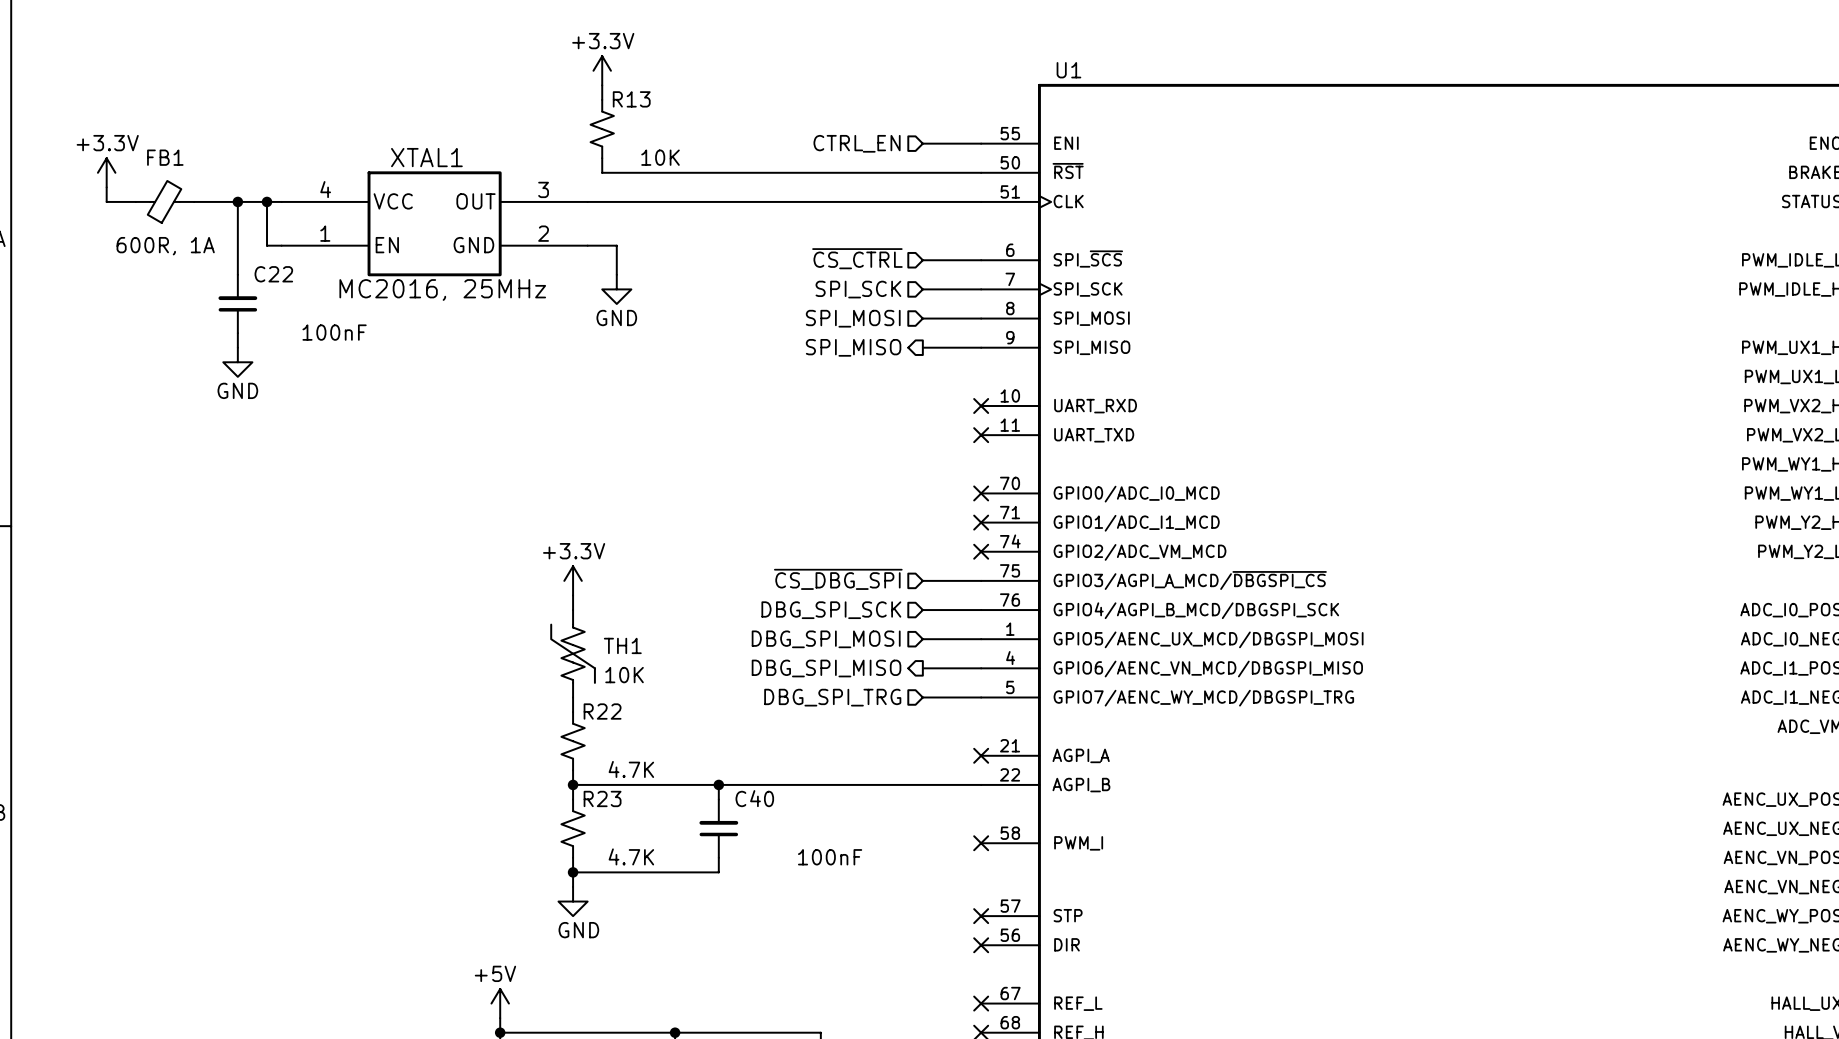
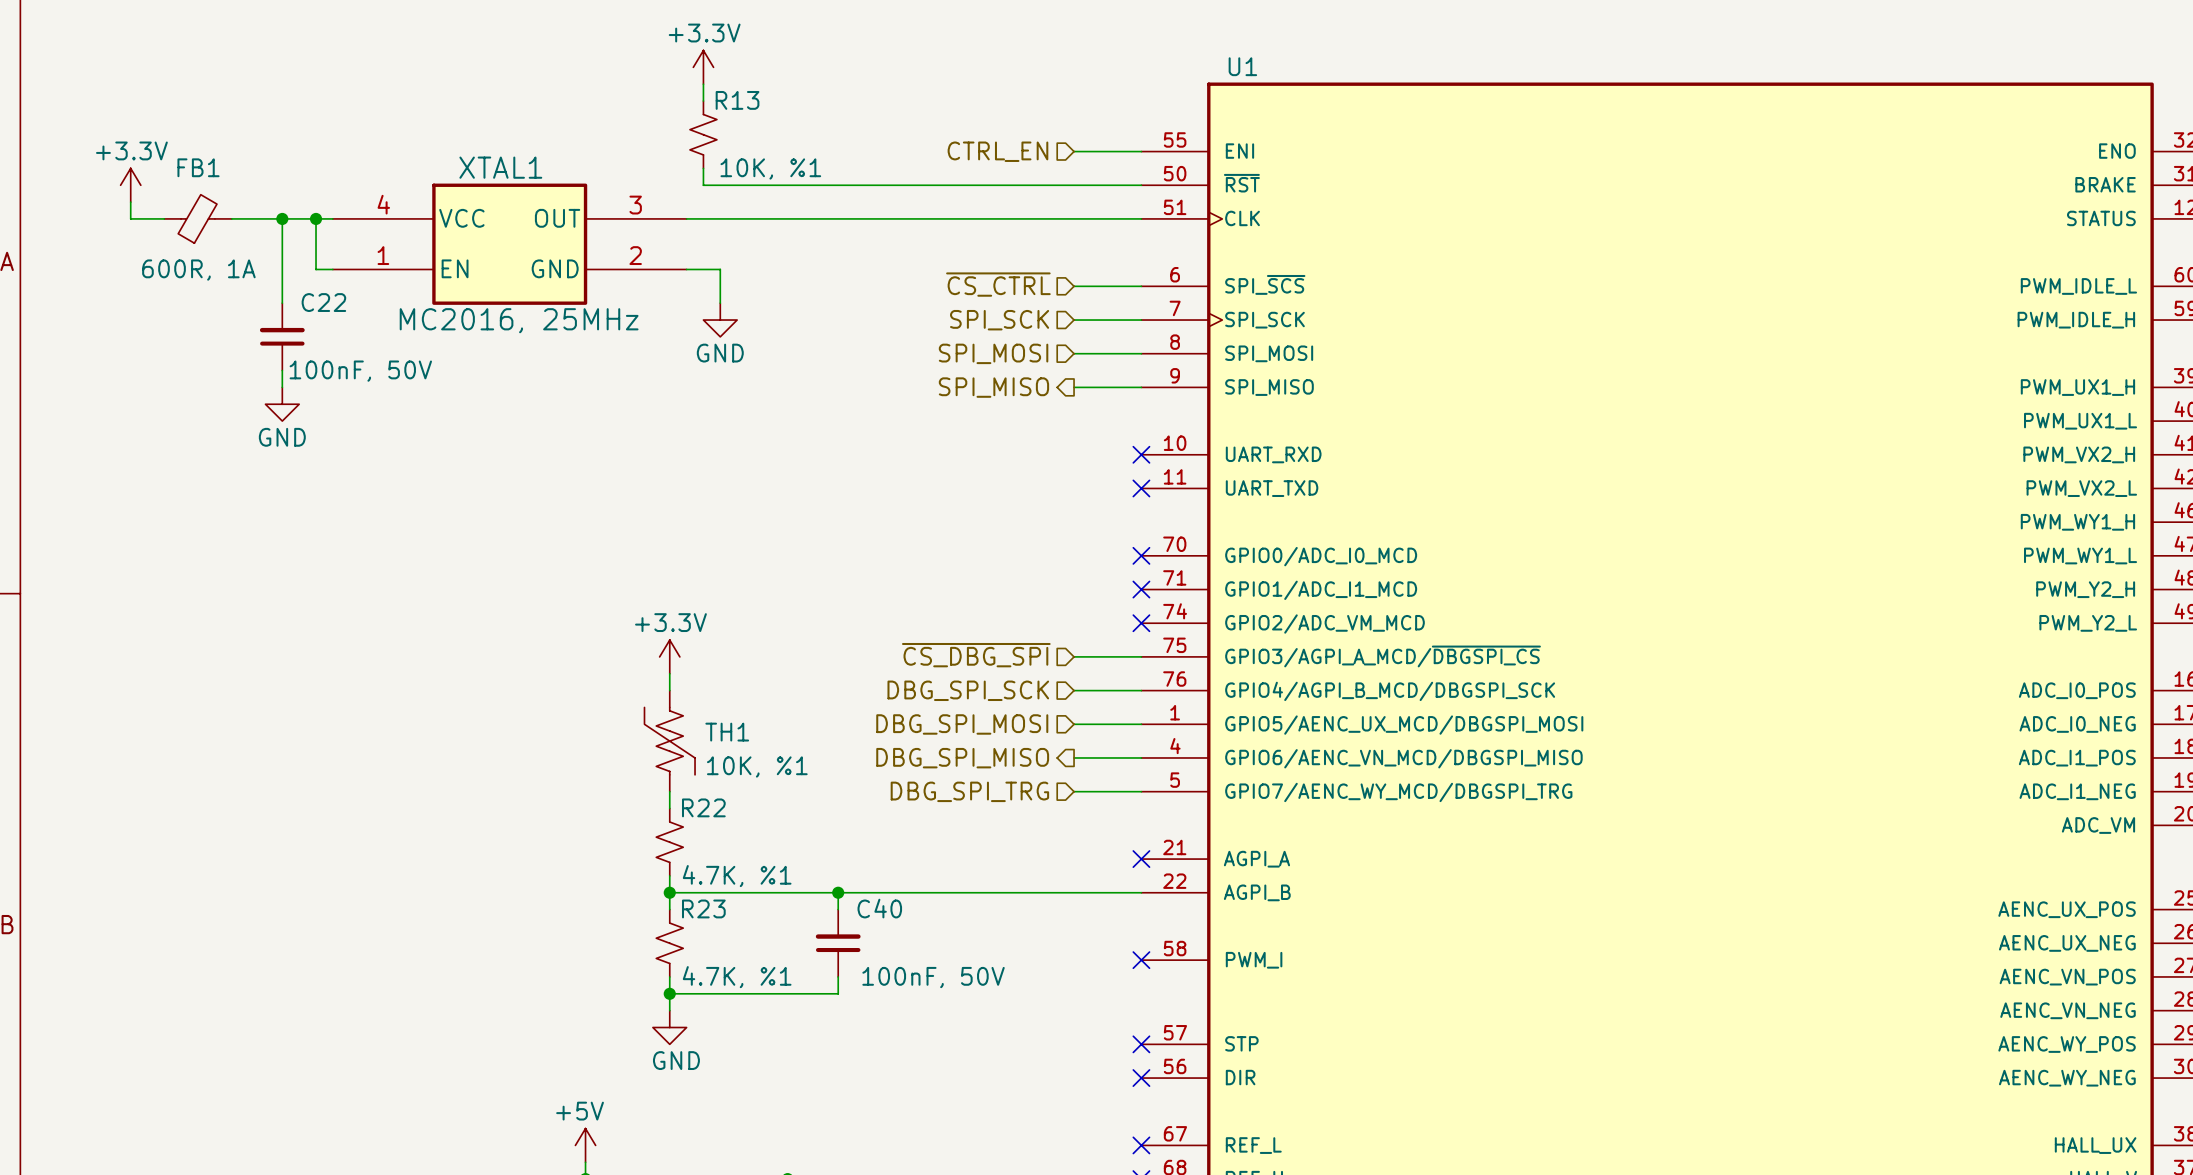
R13 value: 10K (660, 157) -> 10K, %1 (770, 168)
C22 value: 100nF (334, 332) -> 100nF, 50V (360, 371)
TH1 value: 10K (624, 675) -> 10K, %1 (757, 766)
R22 value: 4.7K (631, 769) -> 4.7K, %1 (737, 876)
R23 value: 4.7K (631, 856) -> 4.7K, %1 (737, 977)
C40 value: 100nF (830, 857) -> 100nF, 50V (933, 977)

